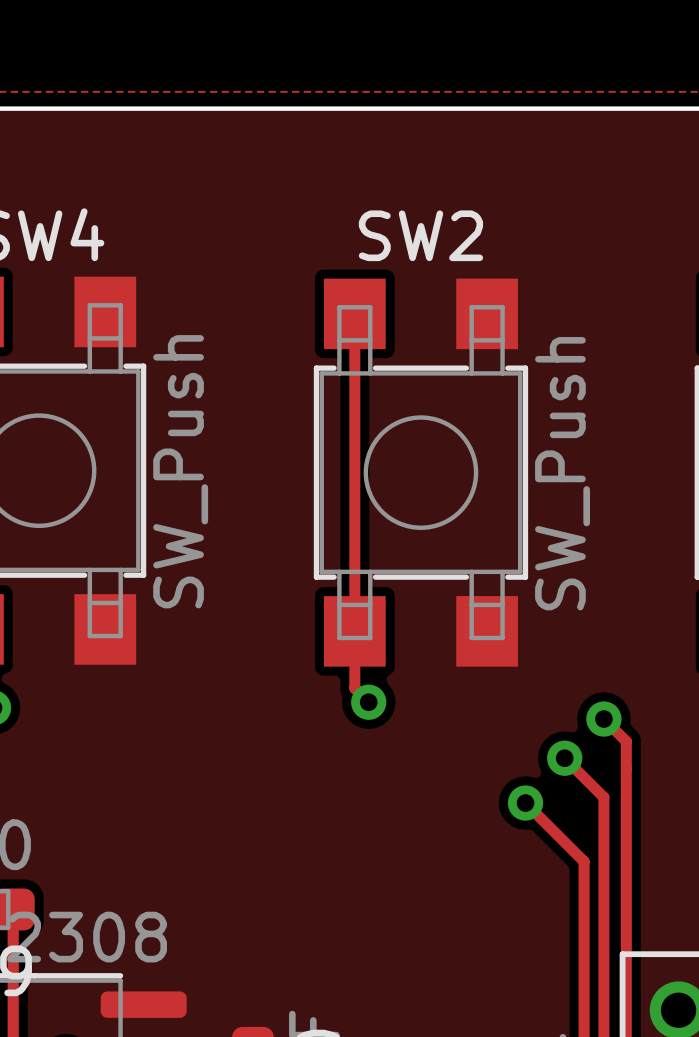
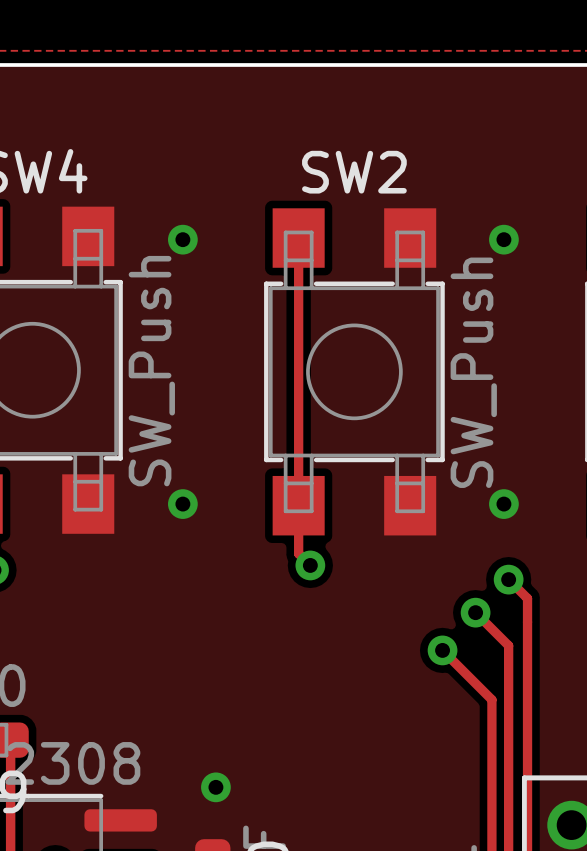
via: none -> (182, 239)
via: none -> (503, 239)
via: none -> (182, 504)
via: none -> (503, 504)
via: none -> (215, 787)

